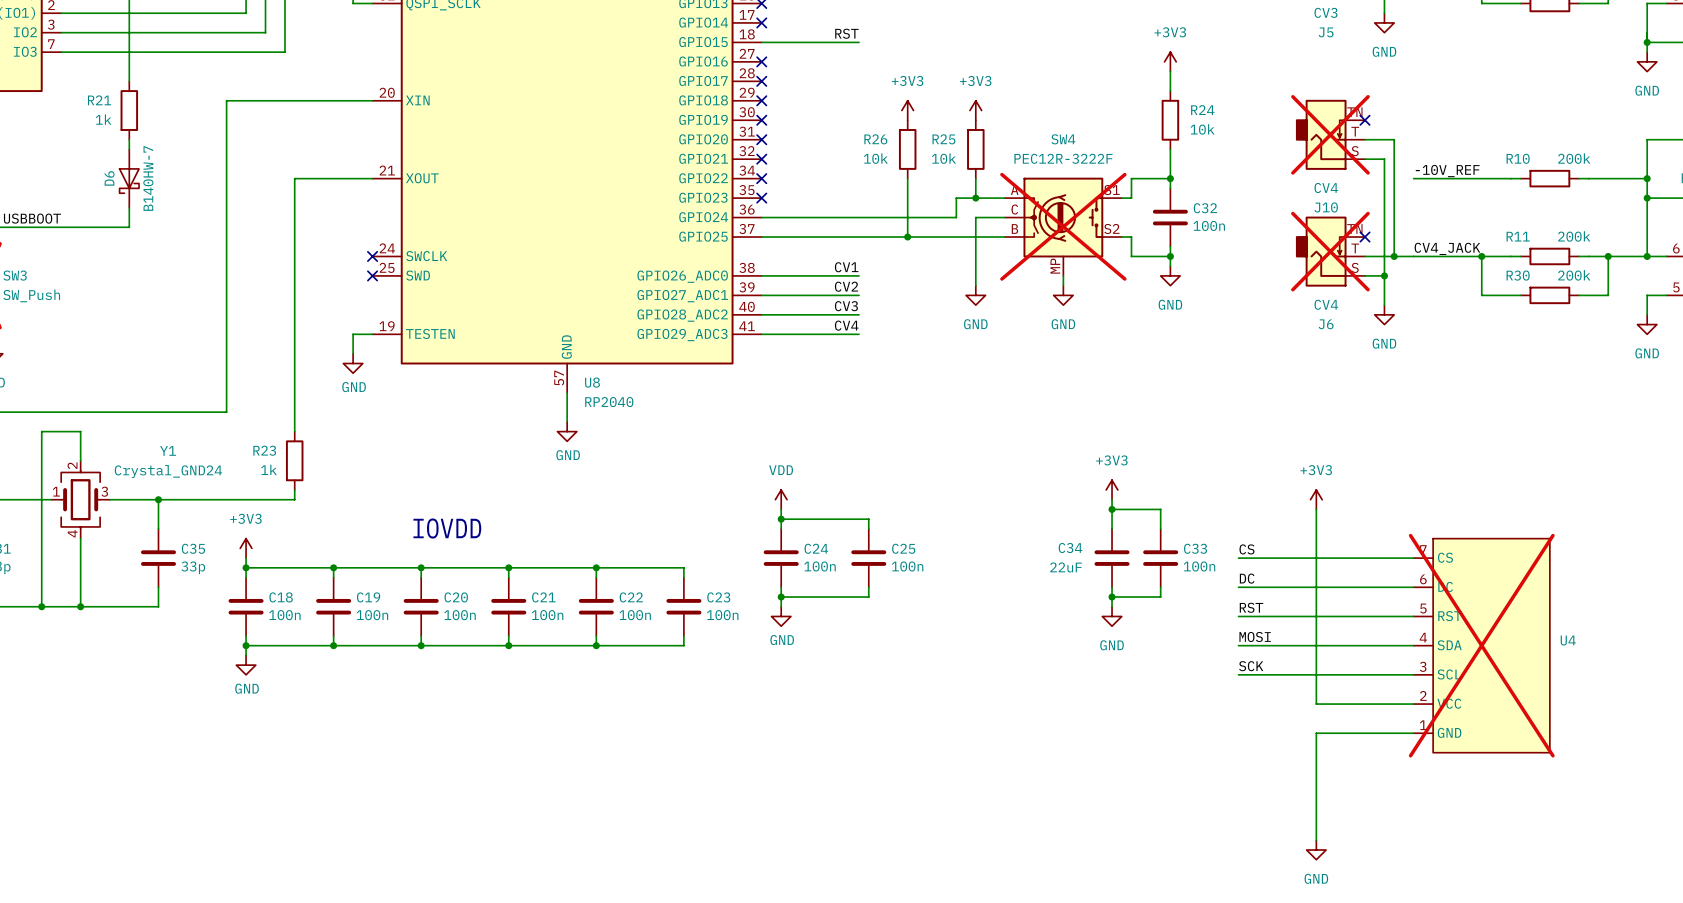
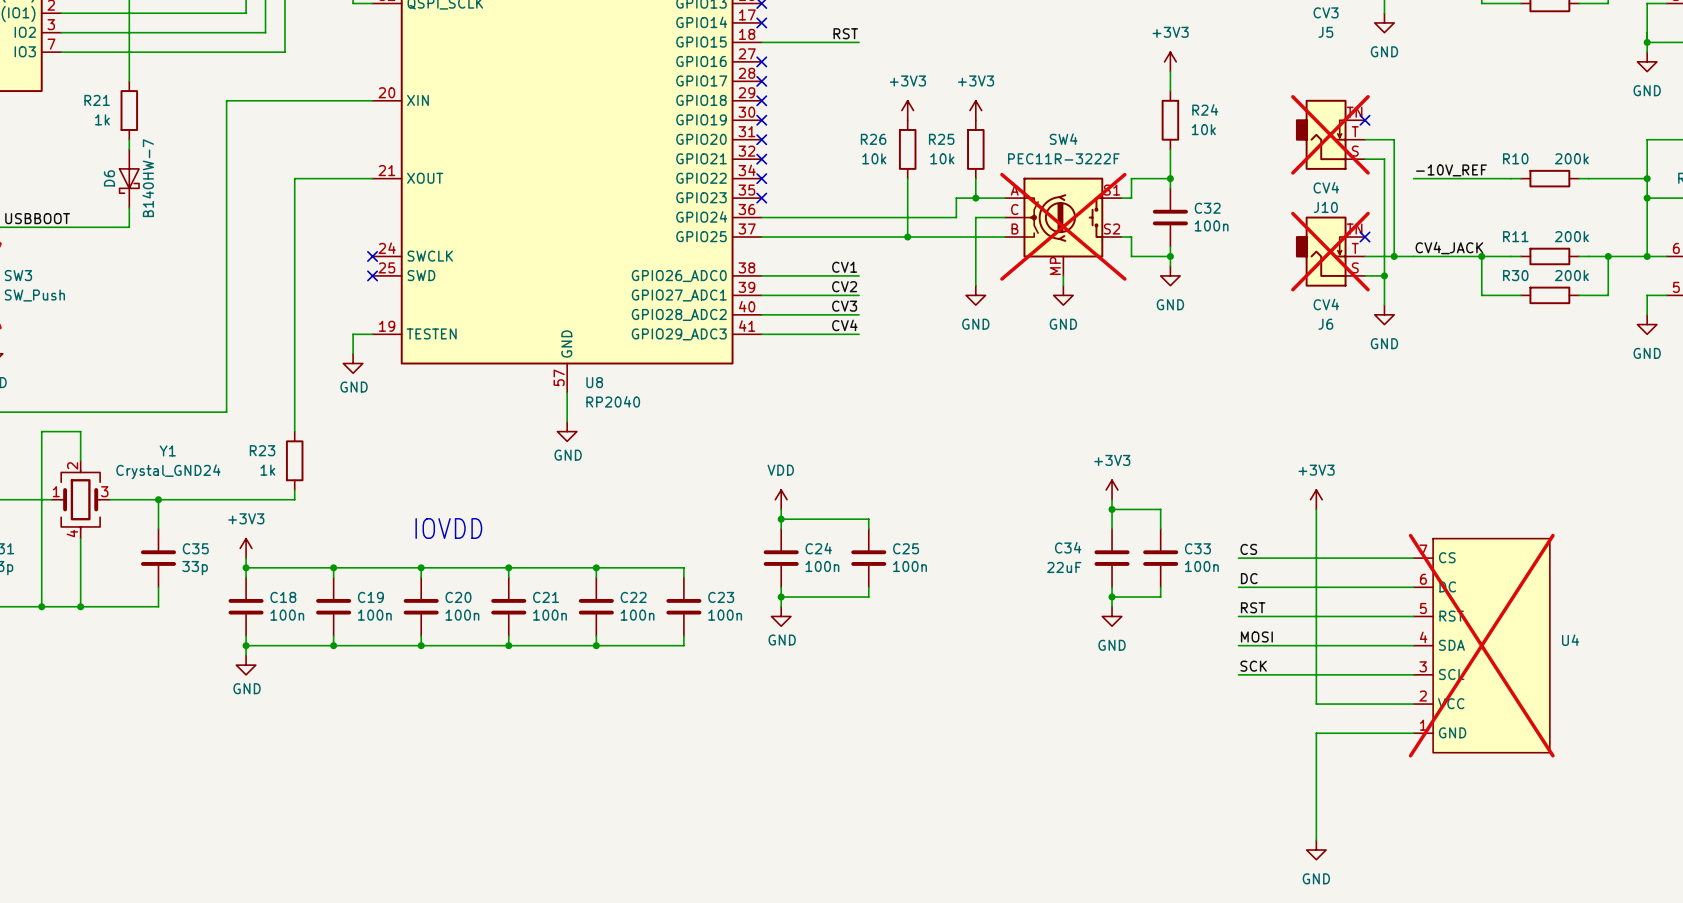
SW4 value: PEC12R-3222F (1063, 158) -> PEC11R-3222F (1063, 158)

